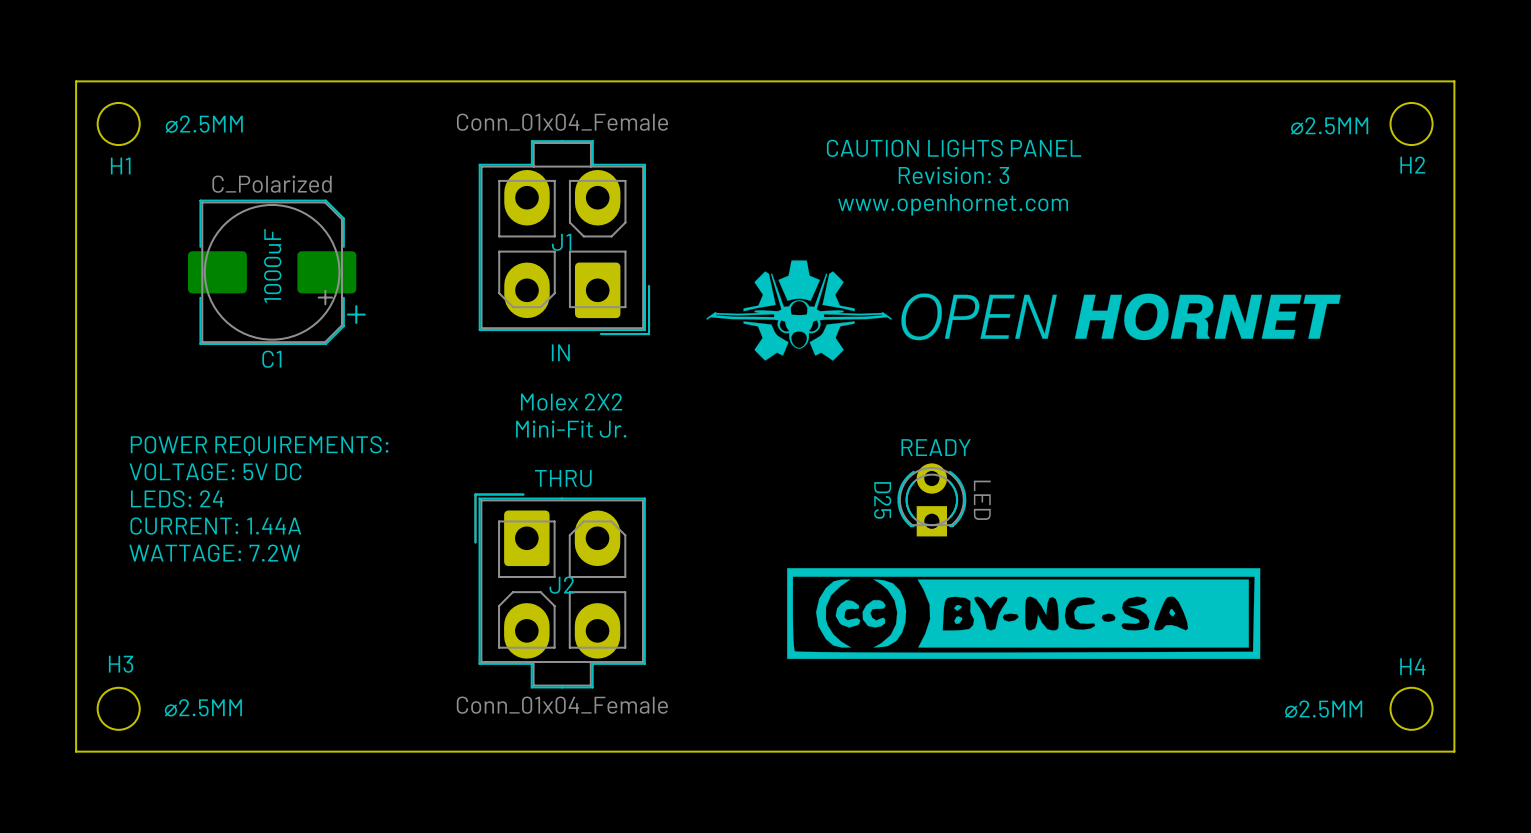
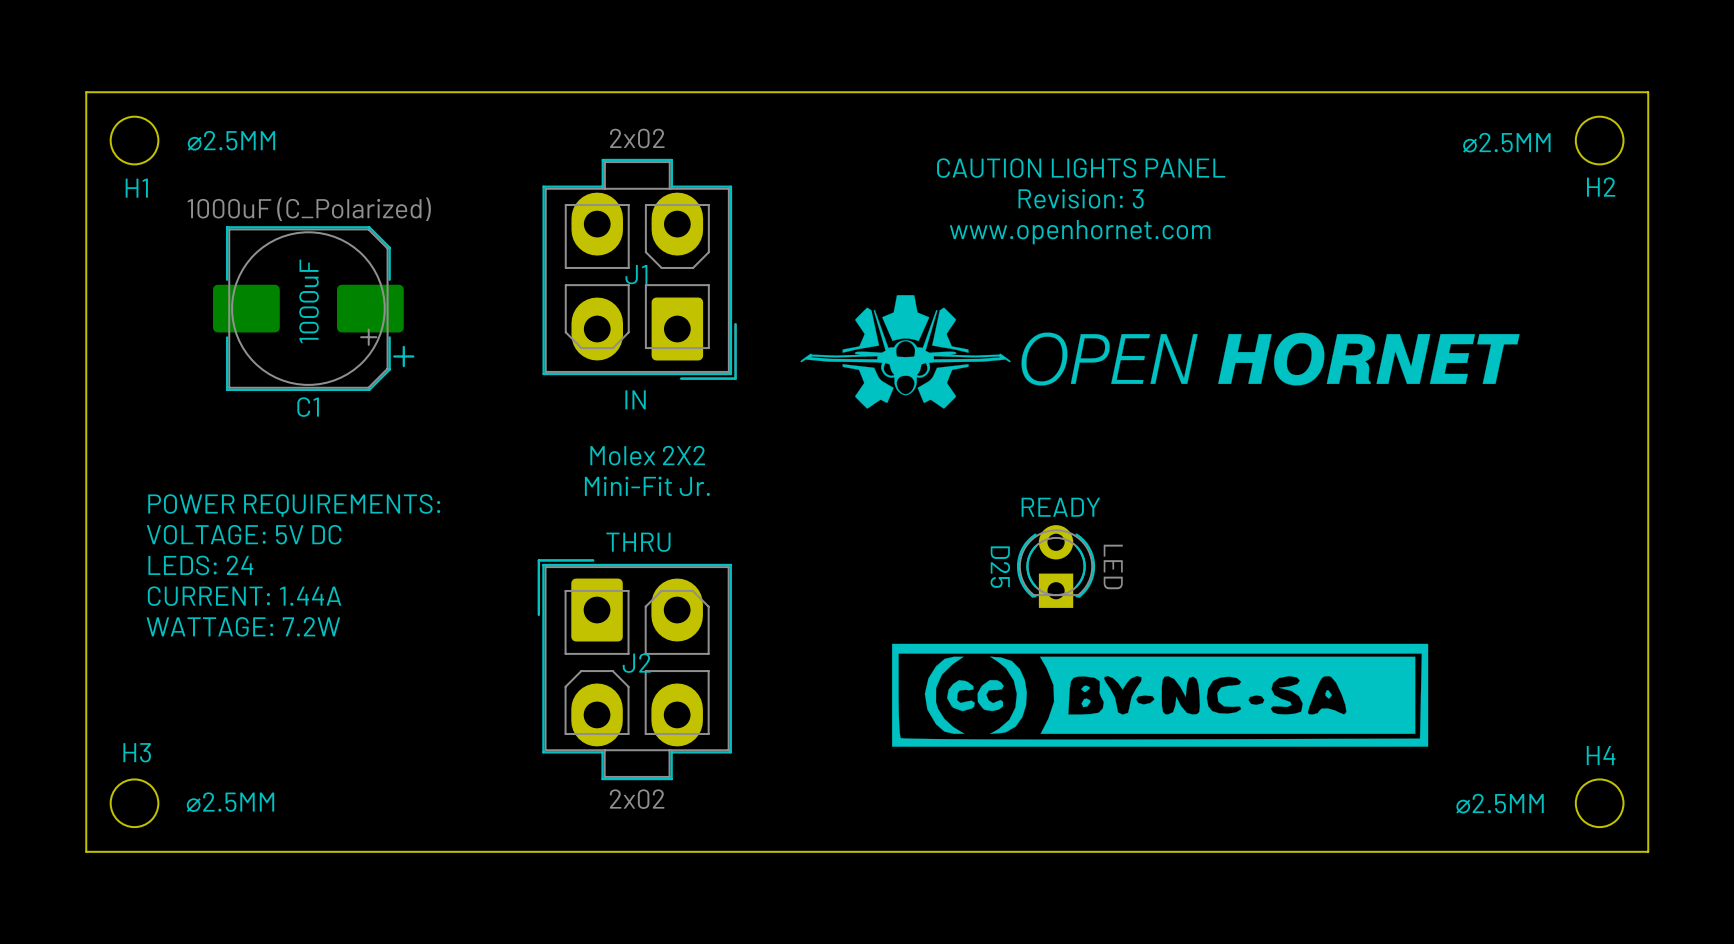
J1 value: Conn_01x04_Female (562, 122) -> 2x02 (637, 138)
C1 value: C_Polarized (272, 184) -> 1000uF (C_Polarized) (309, 209)
J2 value: Conn_01x04_Female (562, 705) -> 2x02 (637, 799)

